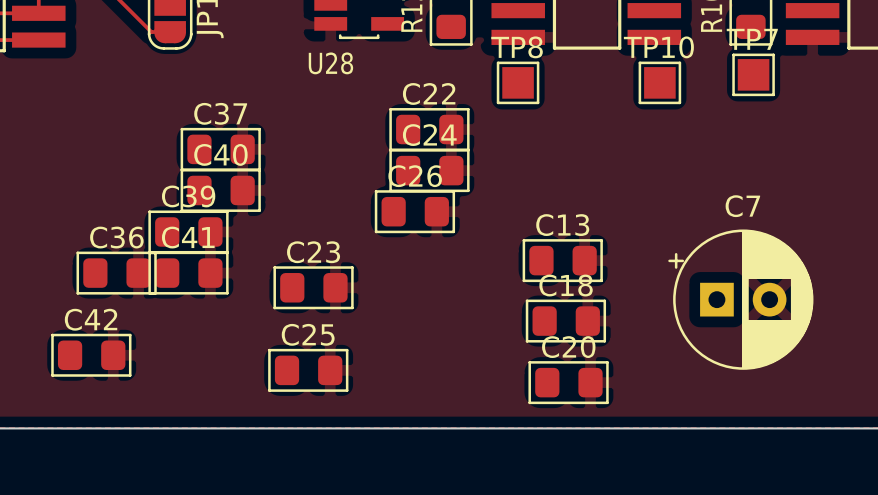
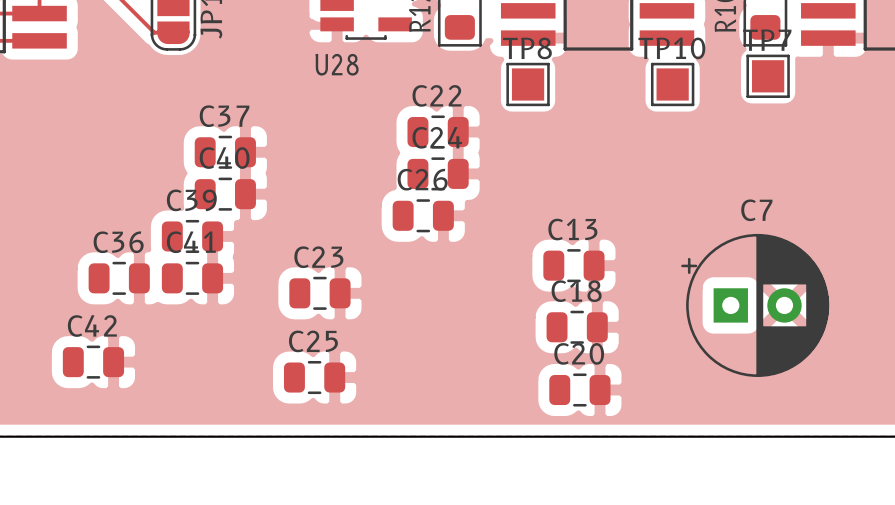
C22 footprint: [389, 108, 470, 152] -> [407, 115, 469, 149]
C37 footprint: [180, 127, 261, 171] -> [194, 135, 256, 169]
C24 footprint: [389, 149, 470, 193] -> [407, 157, 469, 191]
C40 footprint: [180, 168, 261, 212] -> [194, 177, 256, 211]
C26 footprint: [374, 190, 456, 234] -> [392, 199, 454, 233]
C39 footprint: [148, 210, 229, 254] -> [161, 219, 224, 254]
C13 footprint: [522, 239, 603, 283] -> [543, 249, 605, 283]
C36 footprint: [76, 251, 157, 295] -> [88, 261, 150, 295]
C41 footprint: [148, 251, 229, 295] -> [161, 261, 224, 295]
C23 footprint: [273, 266, 354, 310] -> [289, 276, 351, 310]
C18 footprint: [525, 299, 607, 343] -> [546, 310, 608, 344]
C42 footprint: [51, 333, 132, 377] -> [62, 345, 125, 379]
C25 footprint: [268, 348, 349, 392] -> [283, 360, 346, 395]
C20 footprint: [528, 361, 609, 405] -> [549, 373, 611, 407]

